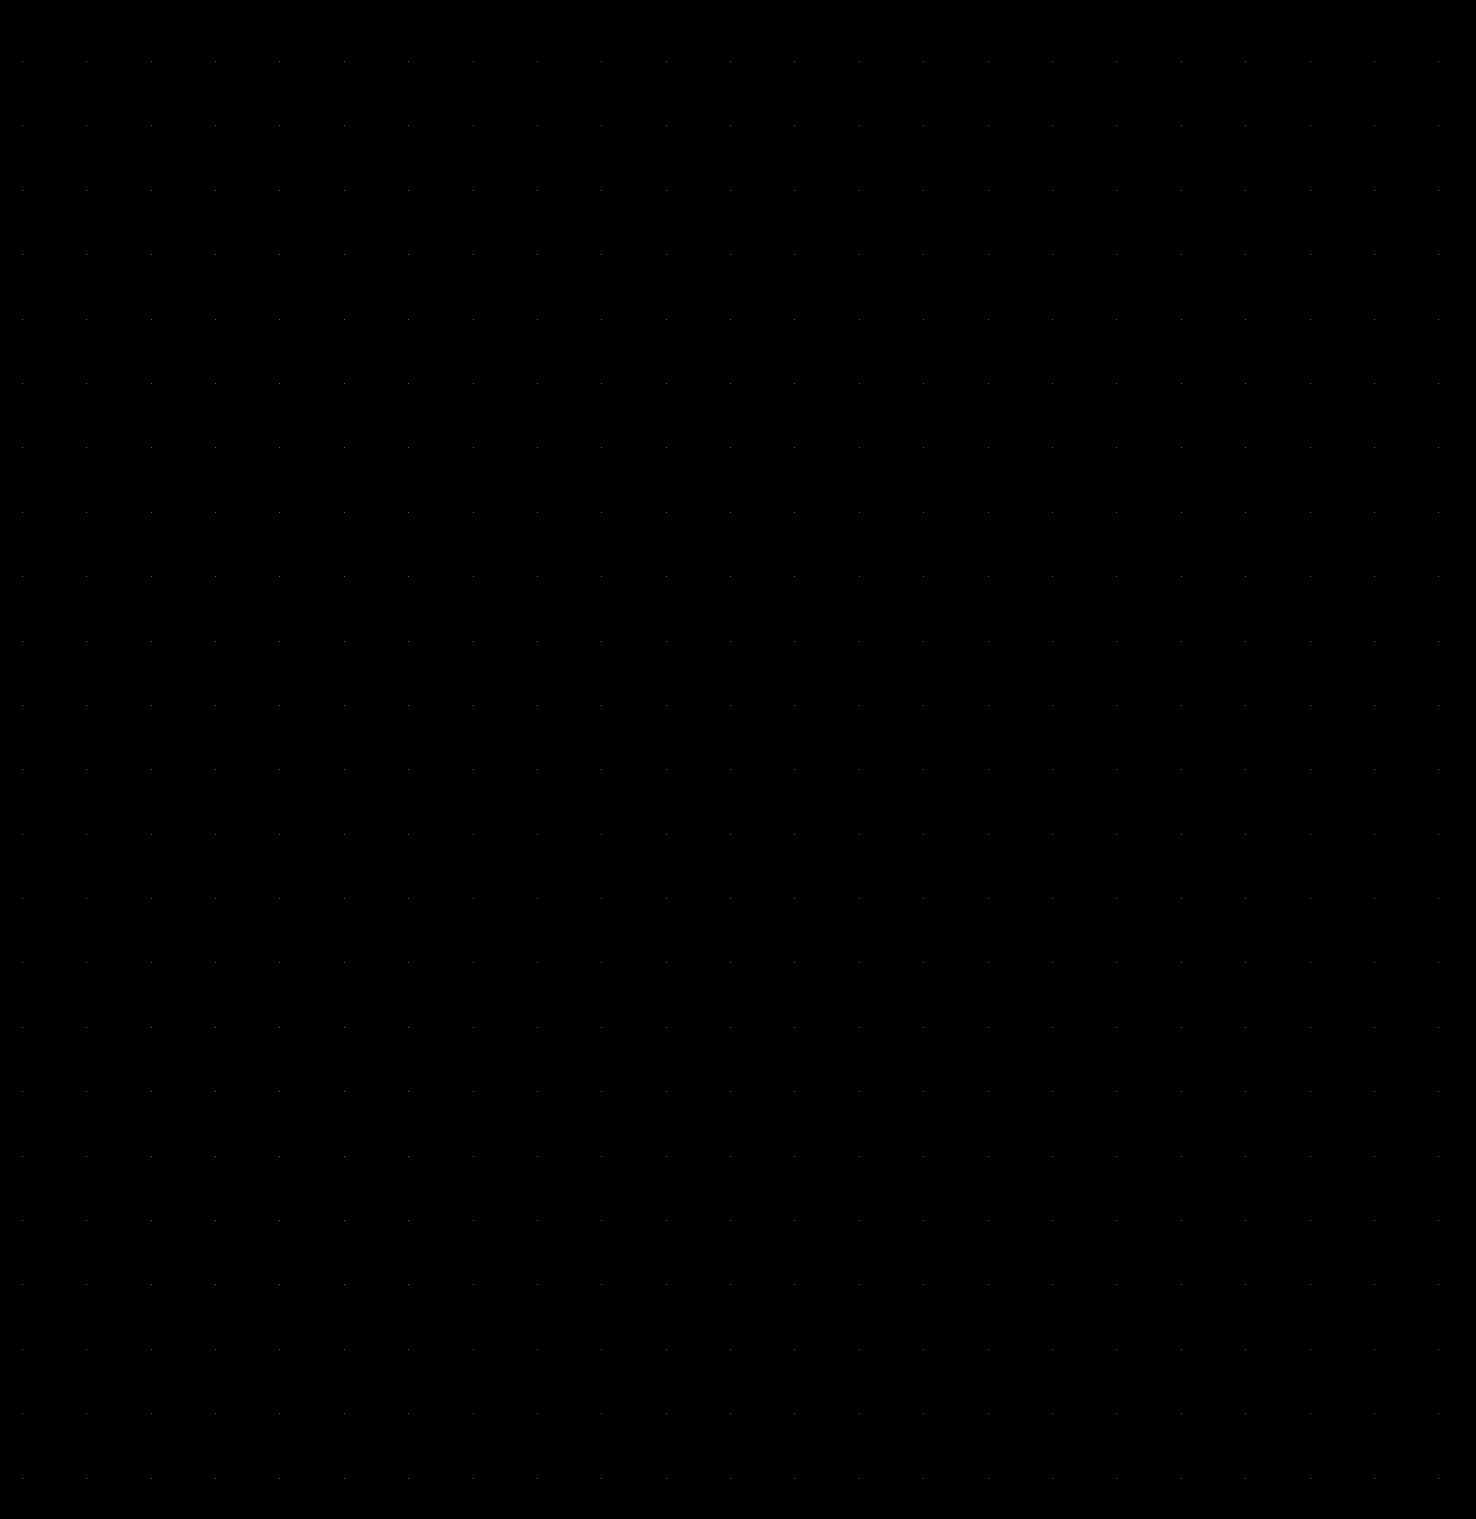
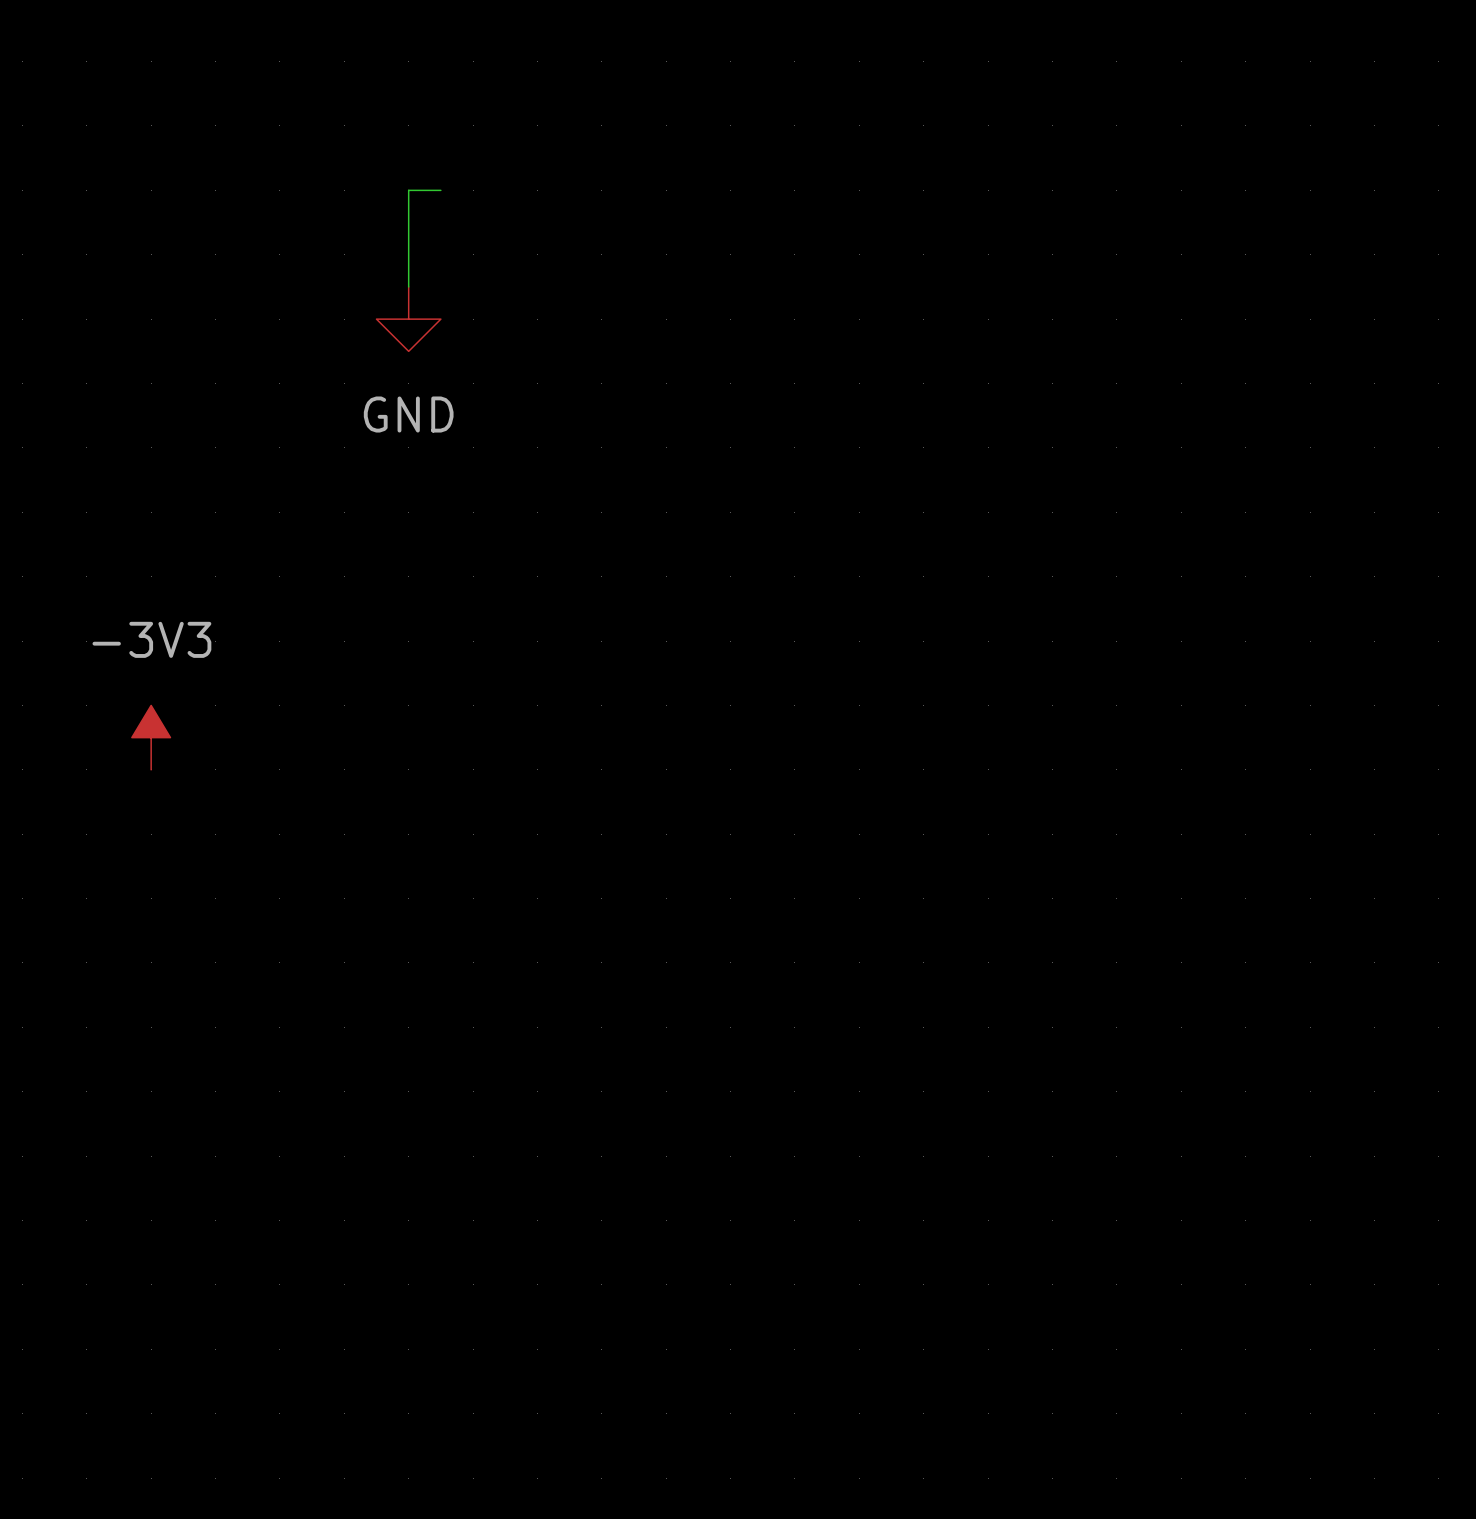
wire: none -> (440, 190) (408, 190) (408, 286)
power symbol: none -> GND (408, 319)
power symbol: none -> -3V3 (151, 737)

